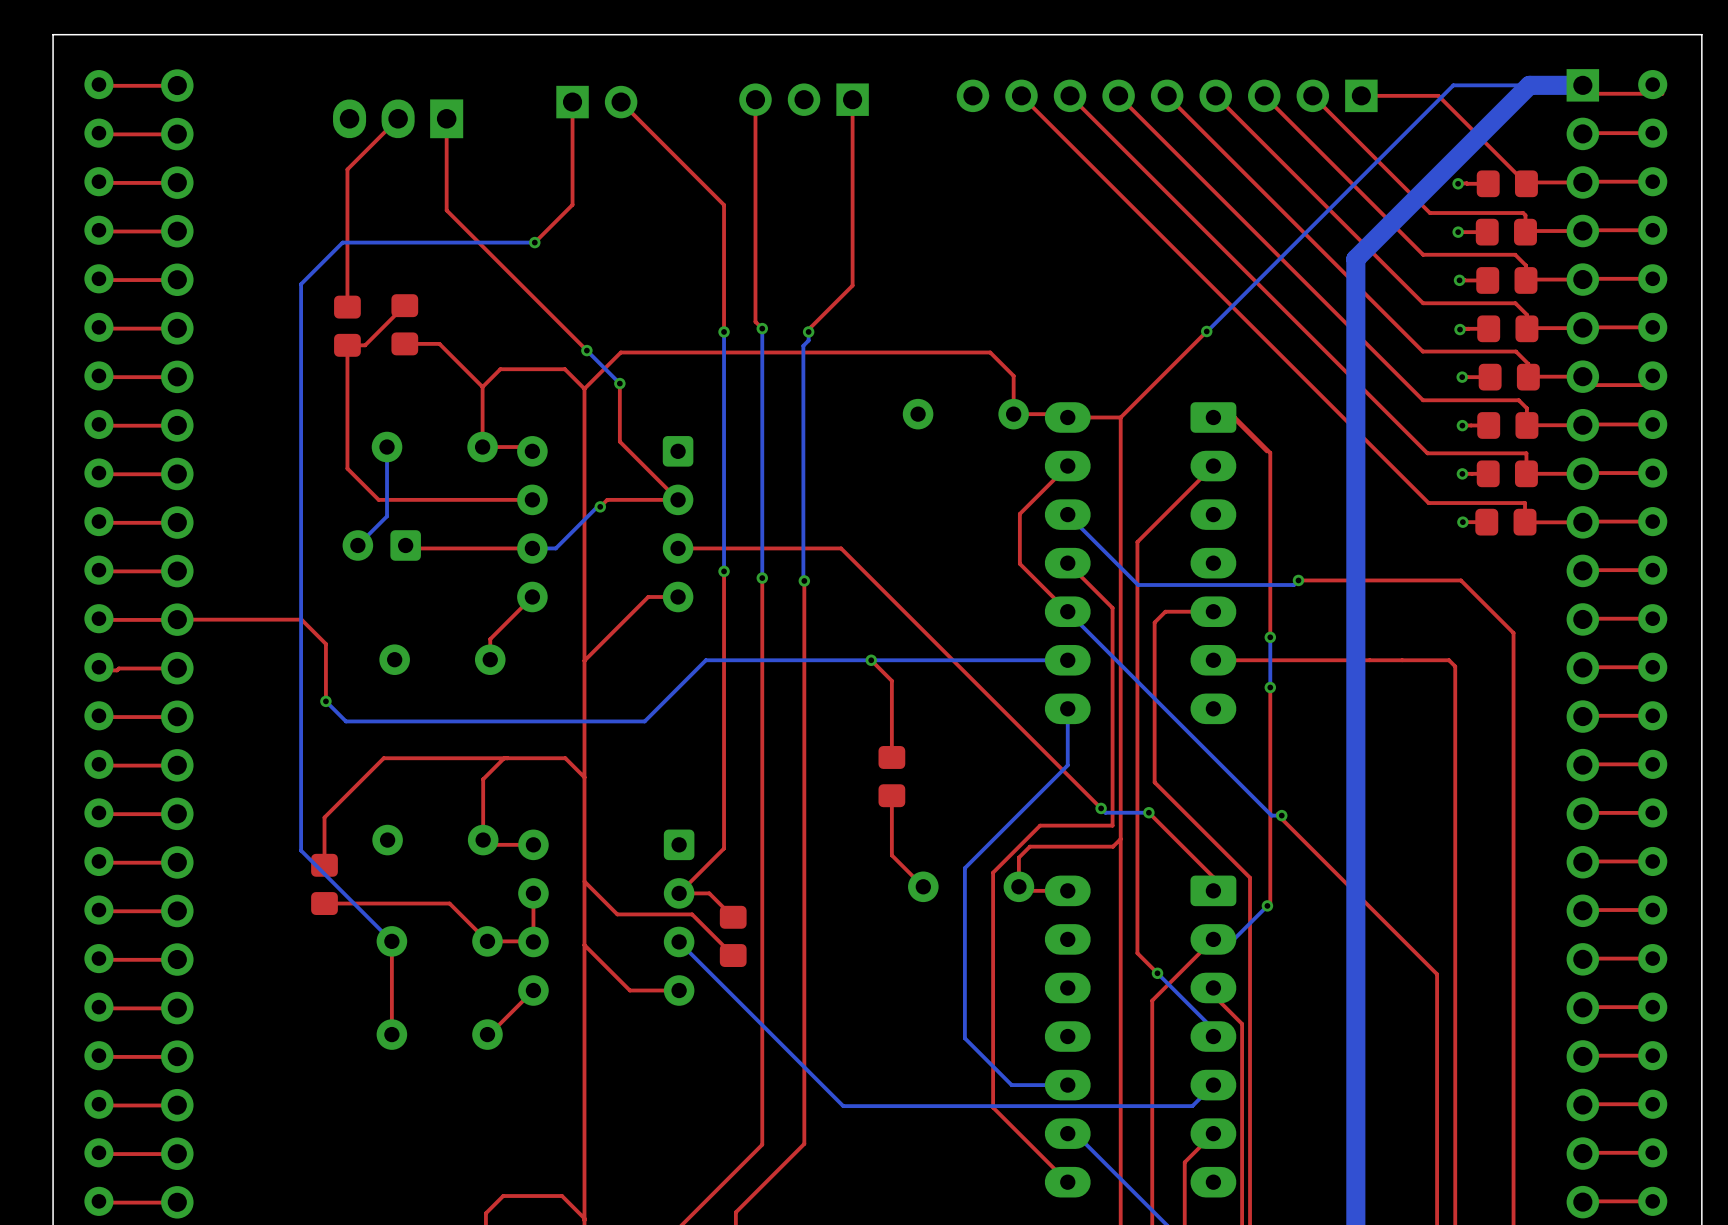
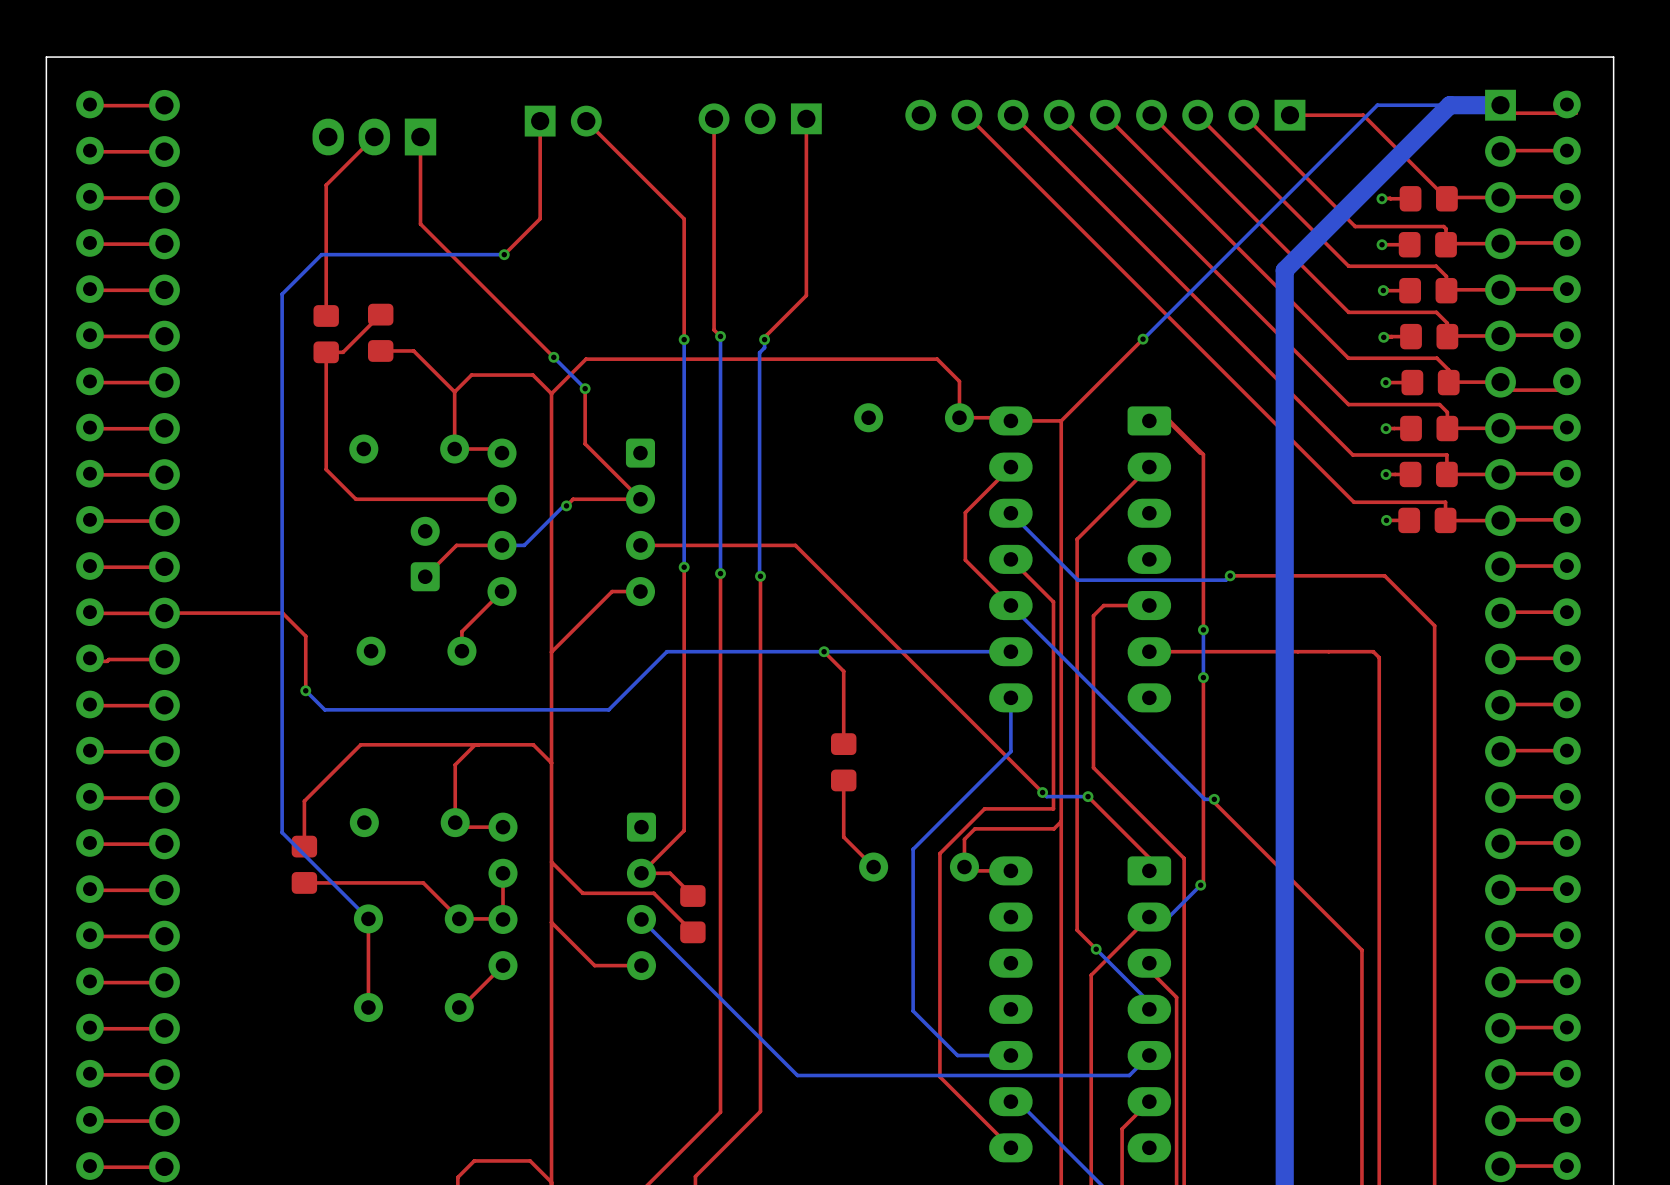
bottom track: (387, 447) (387, 516) (357, 545) -> none
part rotation: 0° (381, 545) -> 90° clockwise (425, 554)
part position: (381, 545) -> (425, 554)
top track: (405, 545) (408, 548) (484, 548) -> (425, 576) (456, 545)

